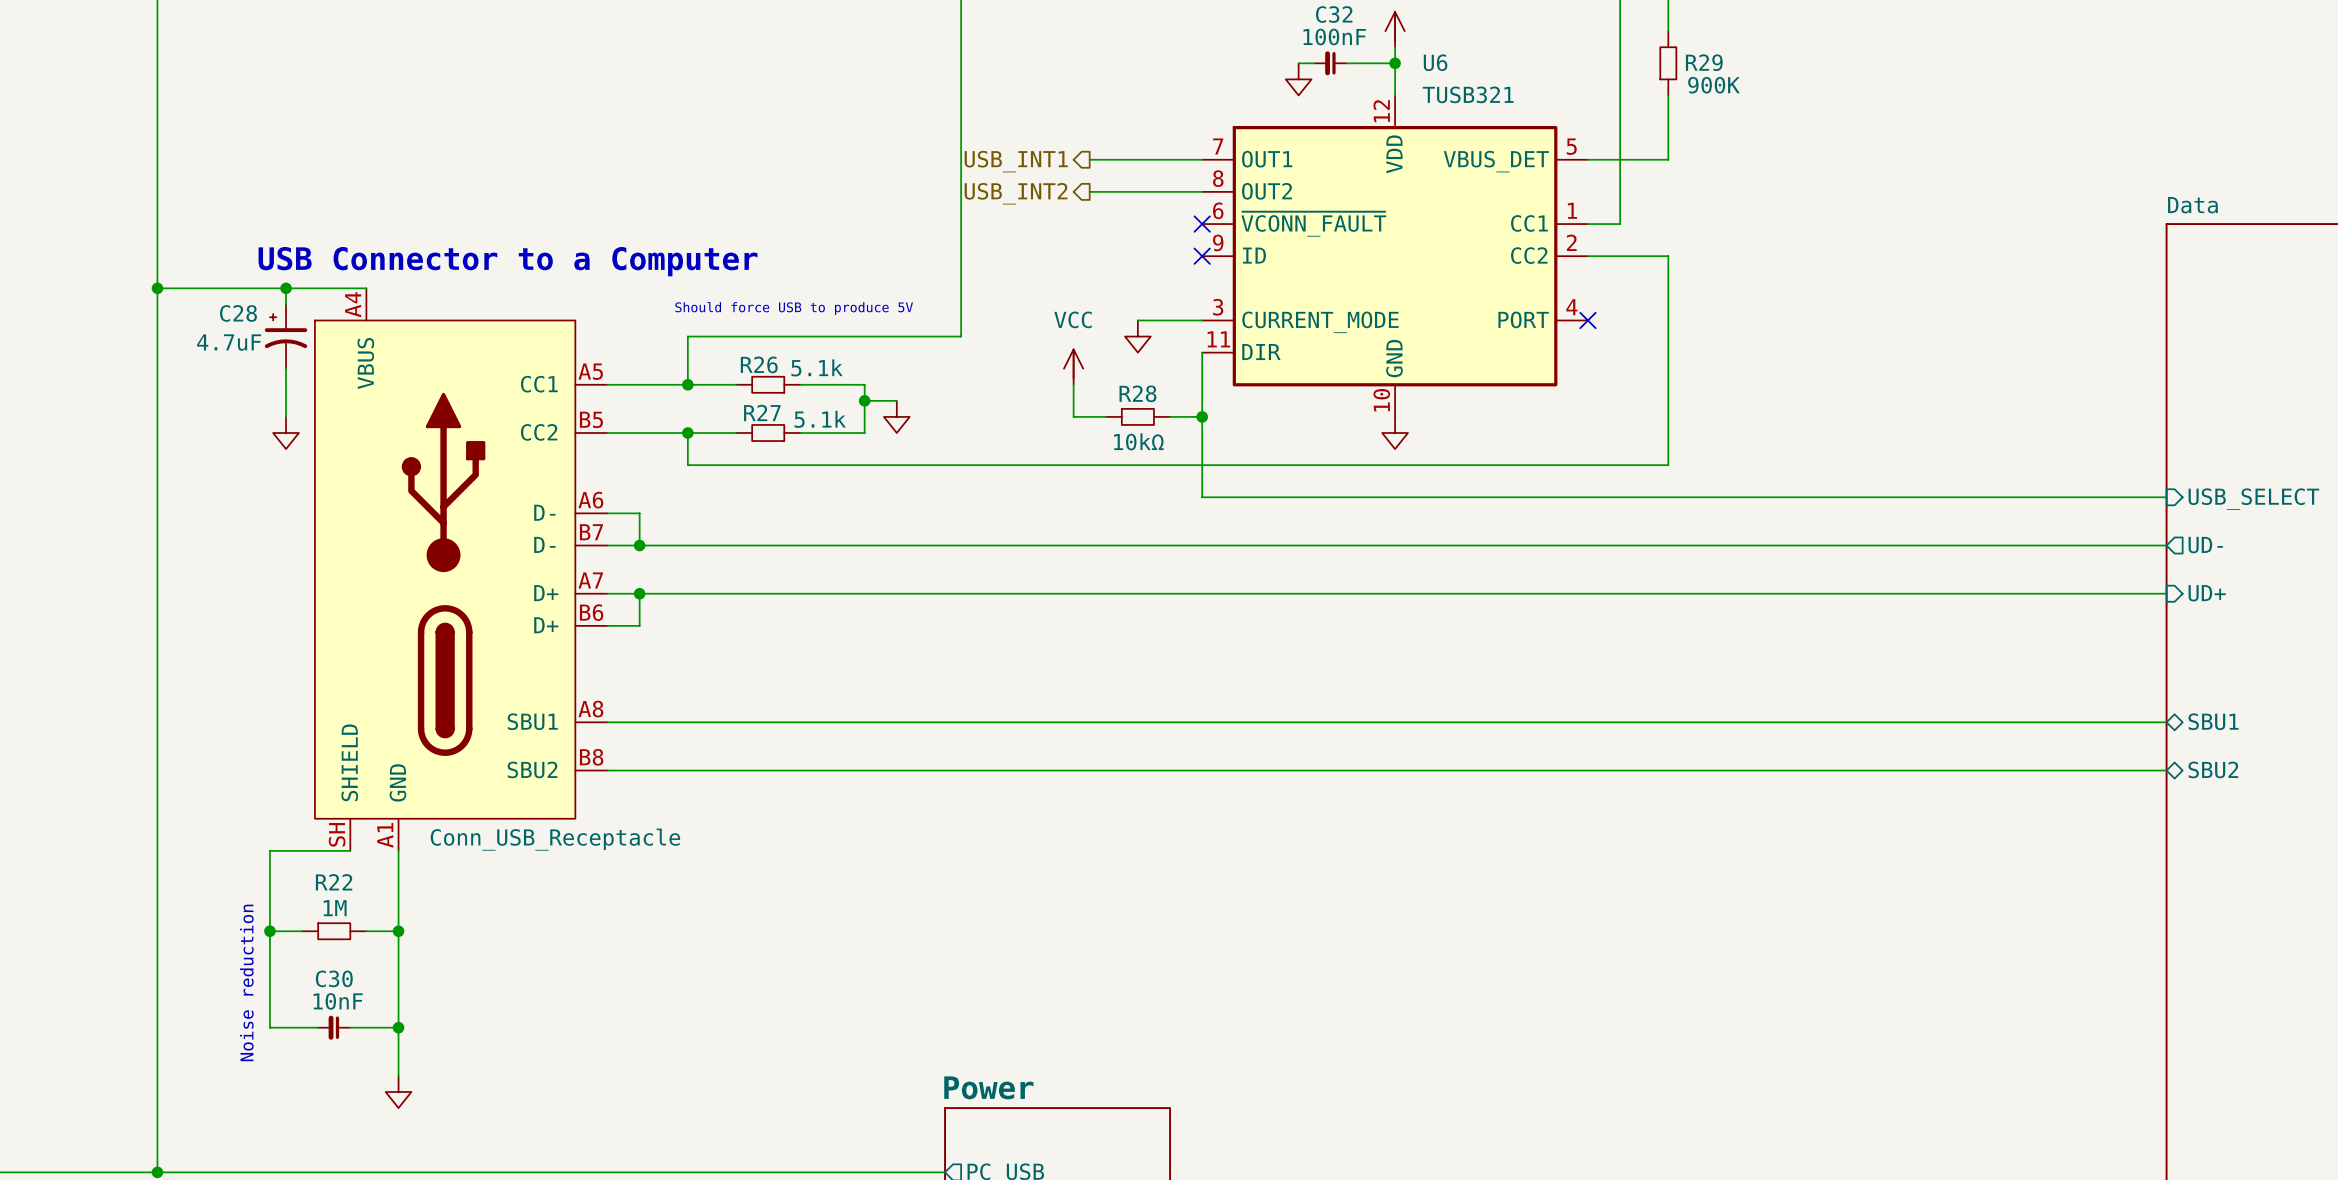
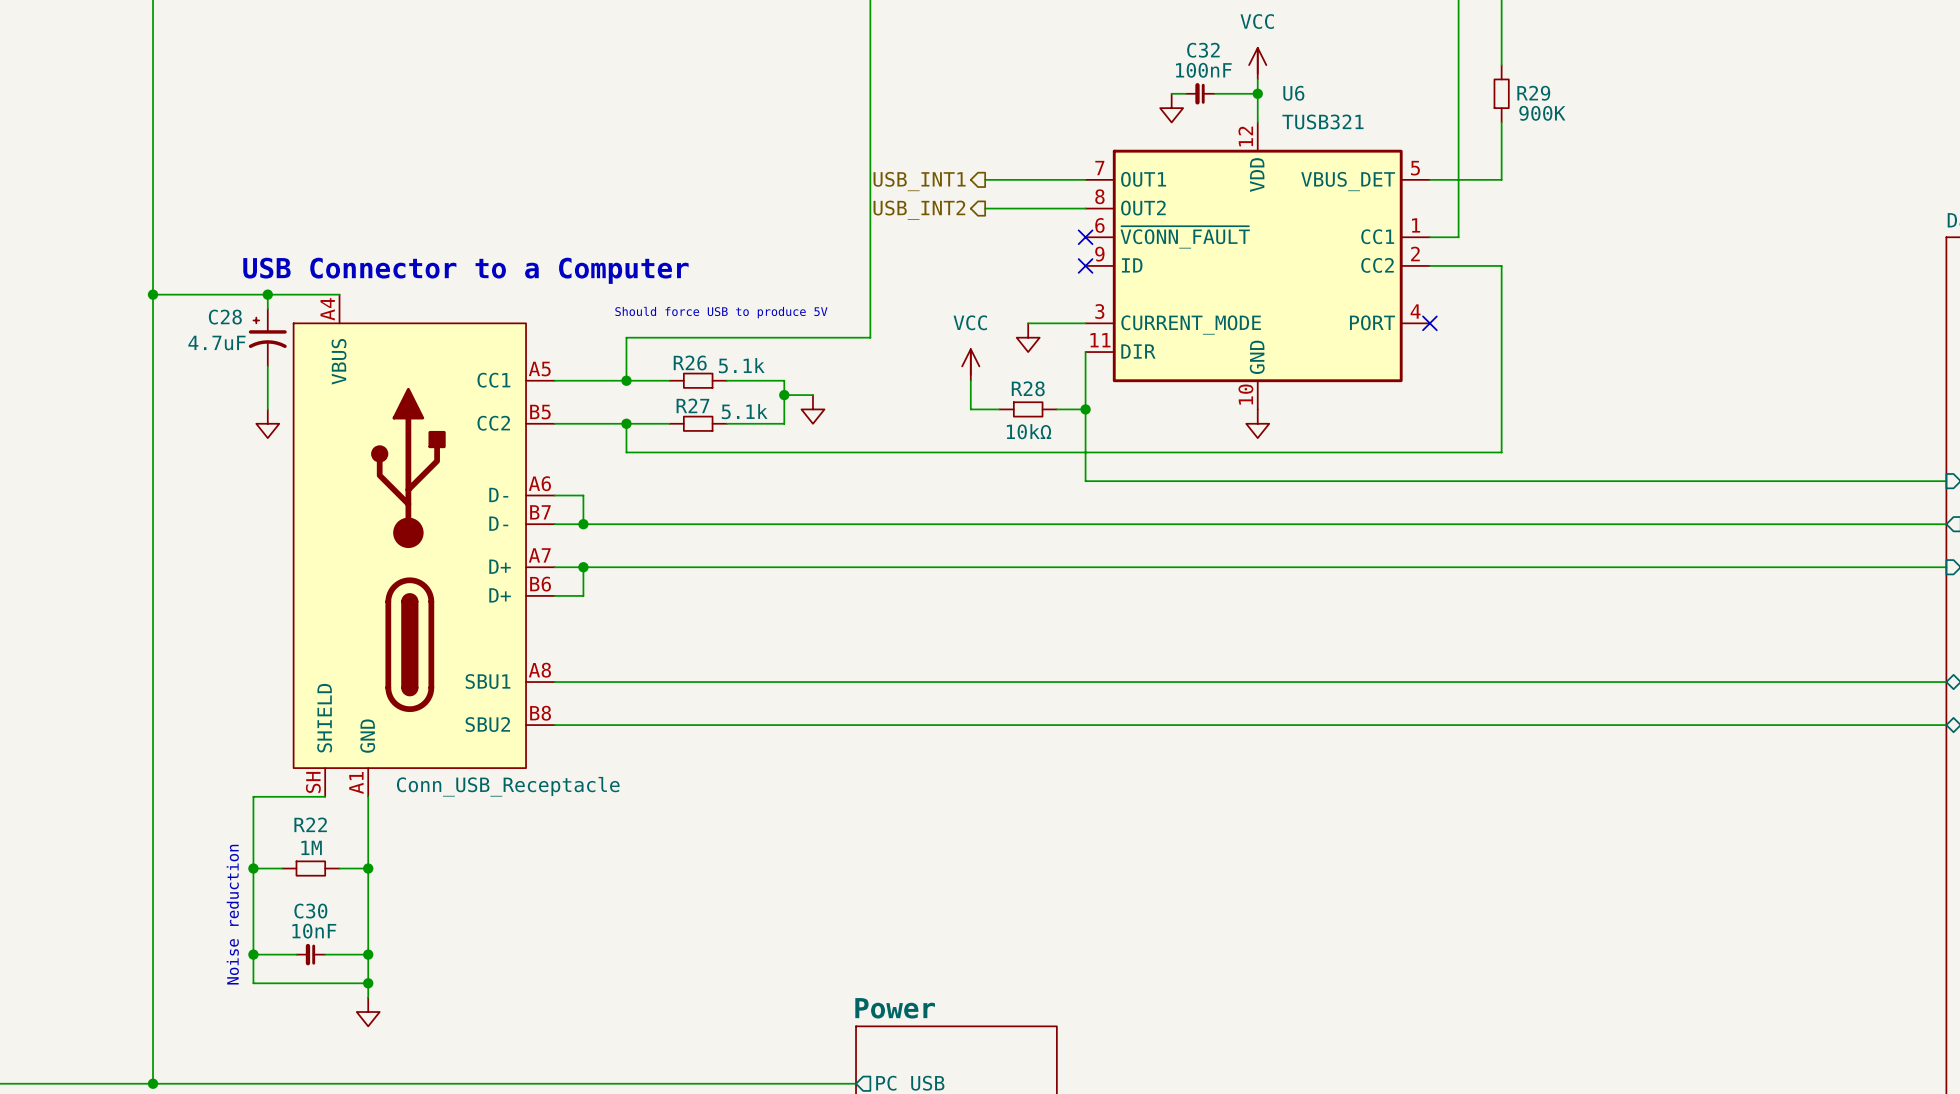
wire: none -> (253, 954) (253, 983) (368, 983)
junction: none -> (253, 954)
junction: none -> (368, 983)

